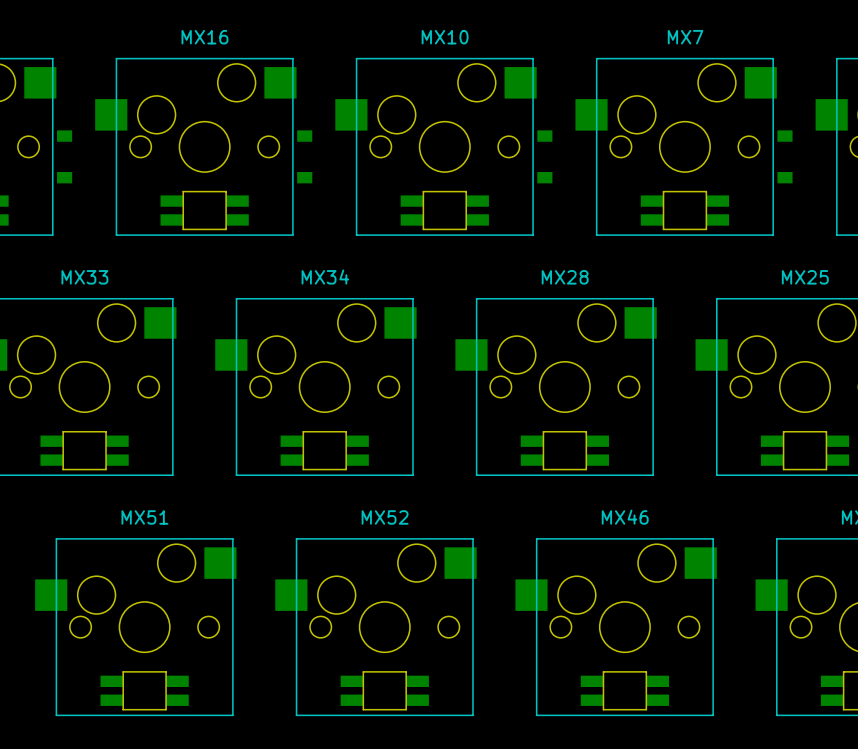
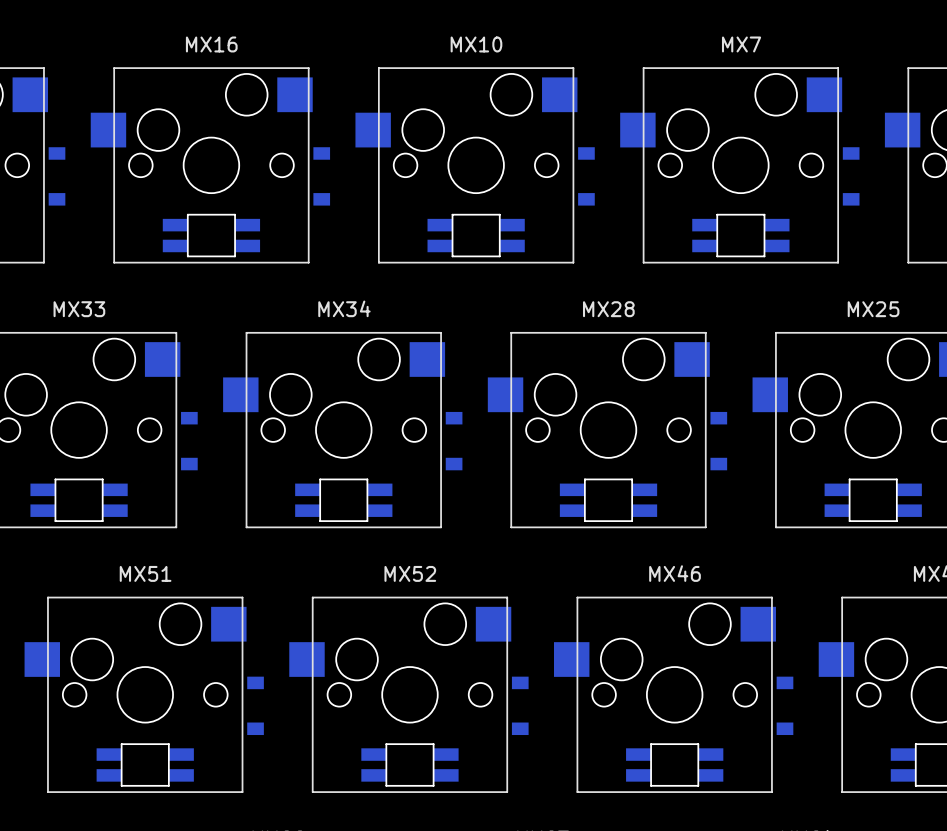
part: none -> (189, 441)
part: none -> (454, 441)
part: none -> (718, 441)
part: none -> (255, 705)
part: none -> (520, 705)
part: none -> (784, 705)

